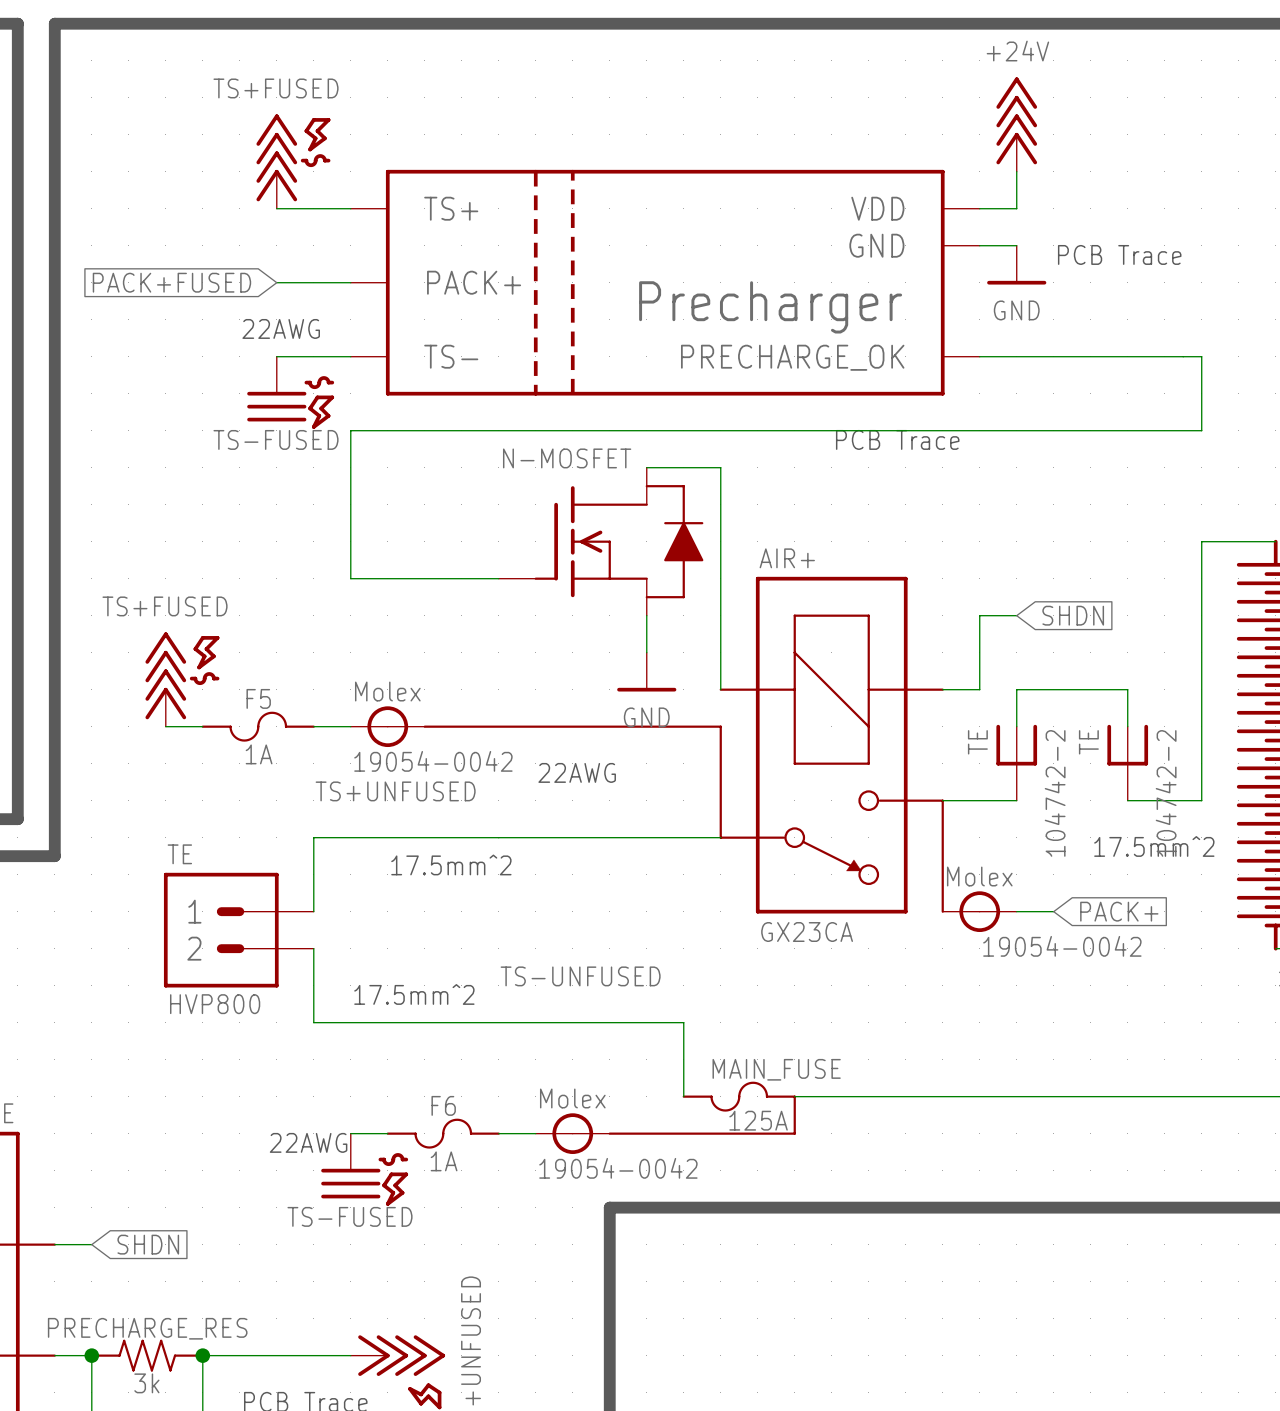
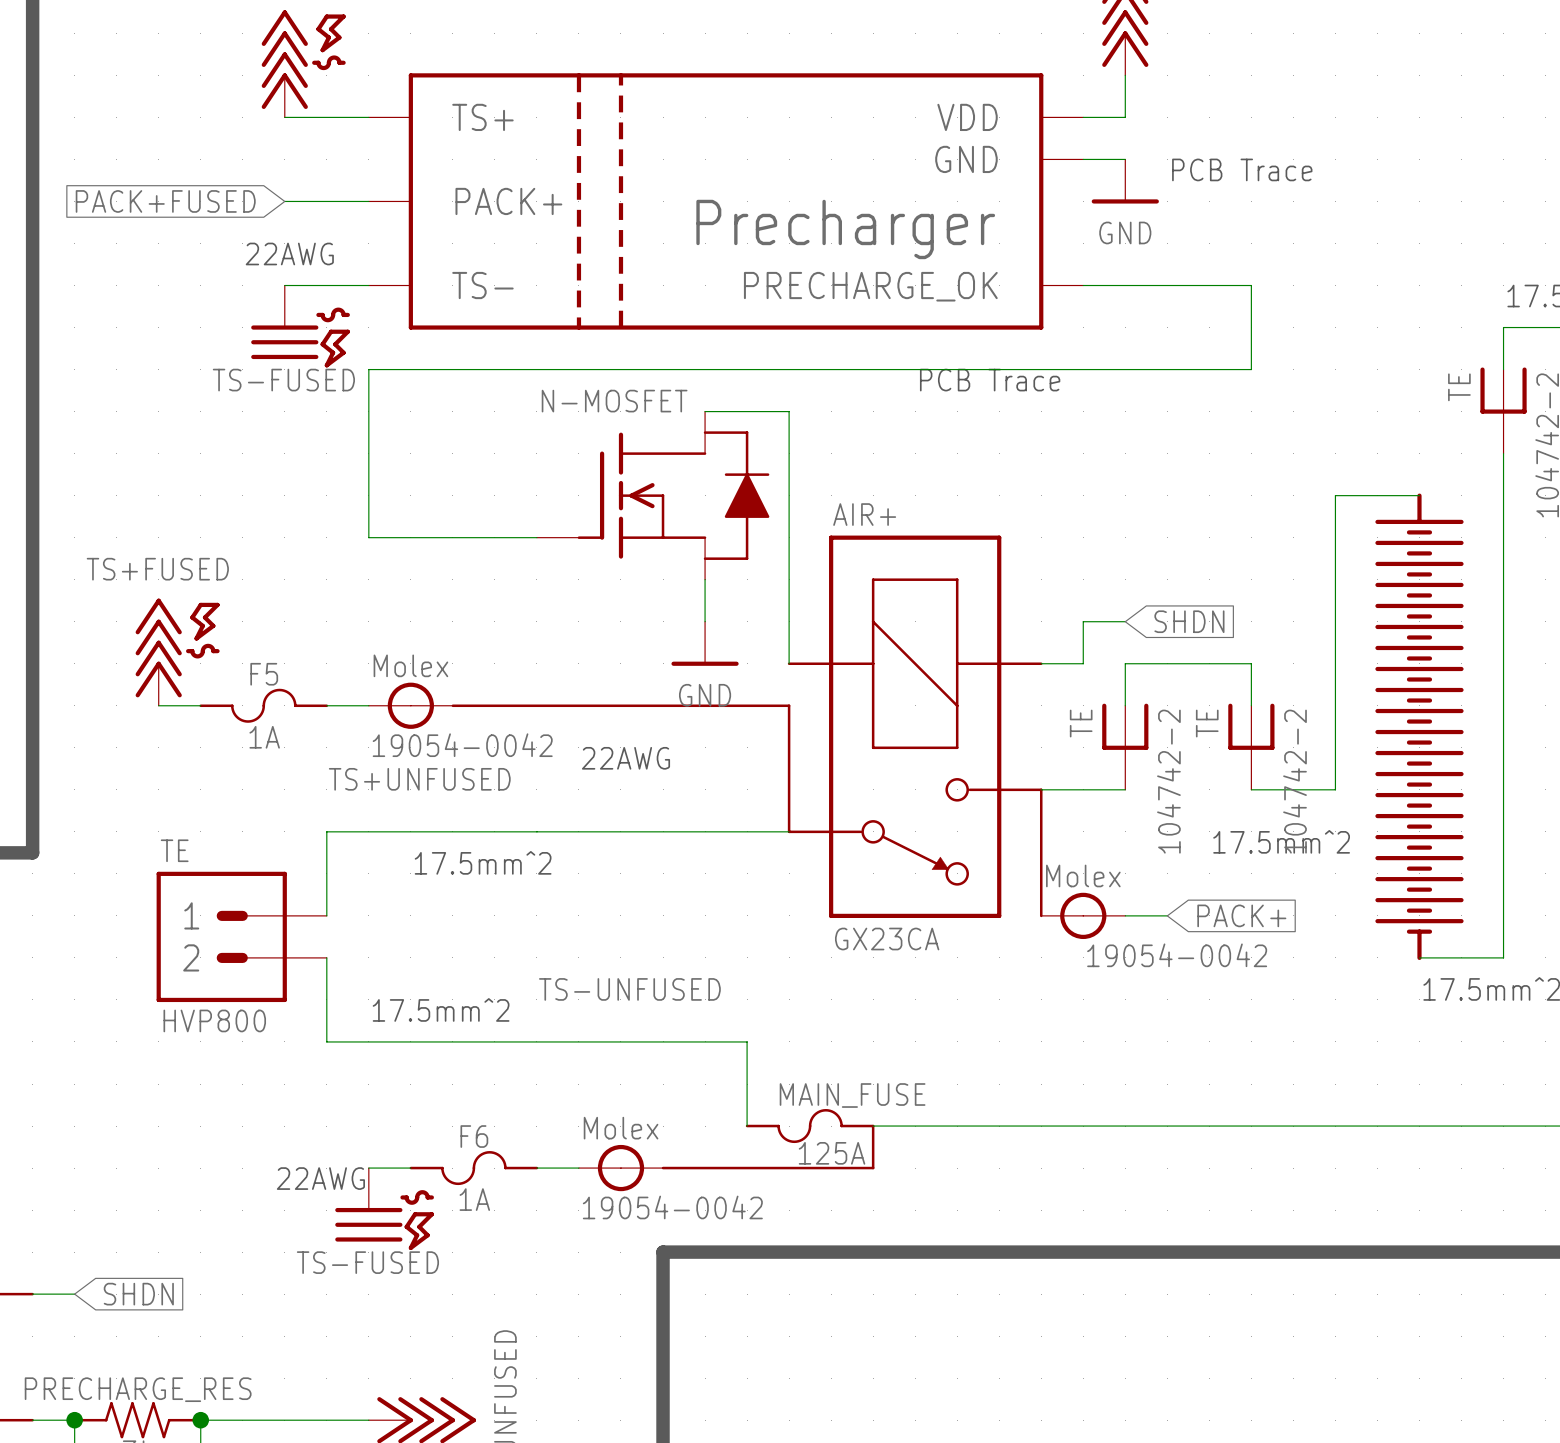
wire: (1127, 356) (1201, 356) (1201, 430) (1127, 430) -> (1251, 285) (1251, 369)
wire: (1016, 615) (979, 615) (979, 652) -> (1125, 621) (1083, 621)
global label position: SHDN (1073, 615) -> SHDN (1189, 621)

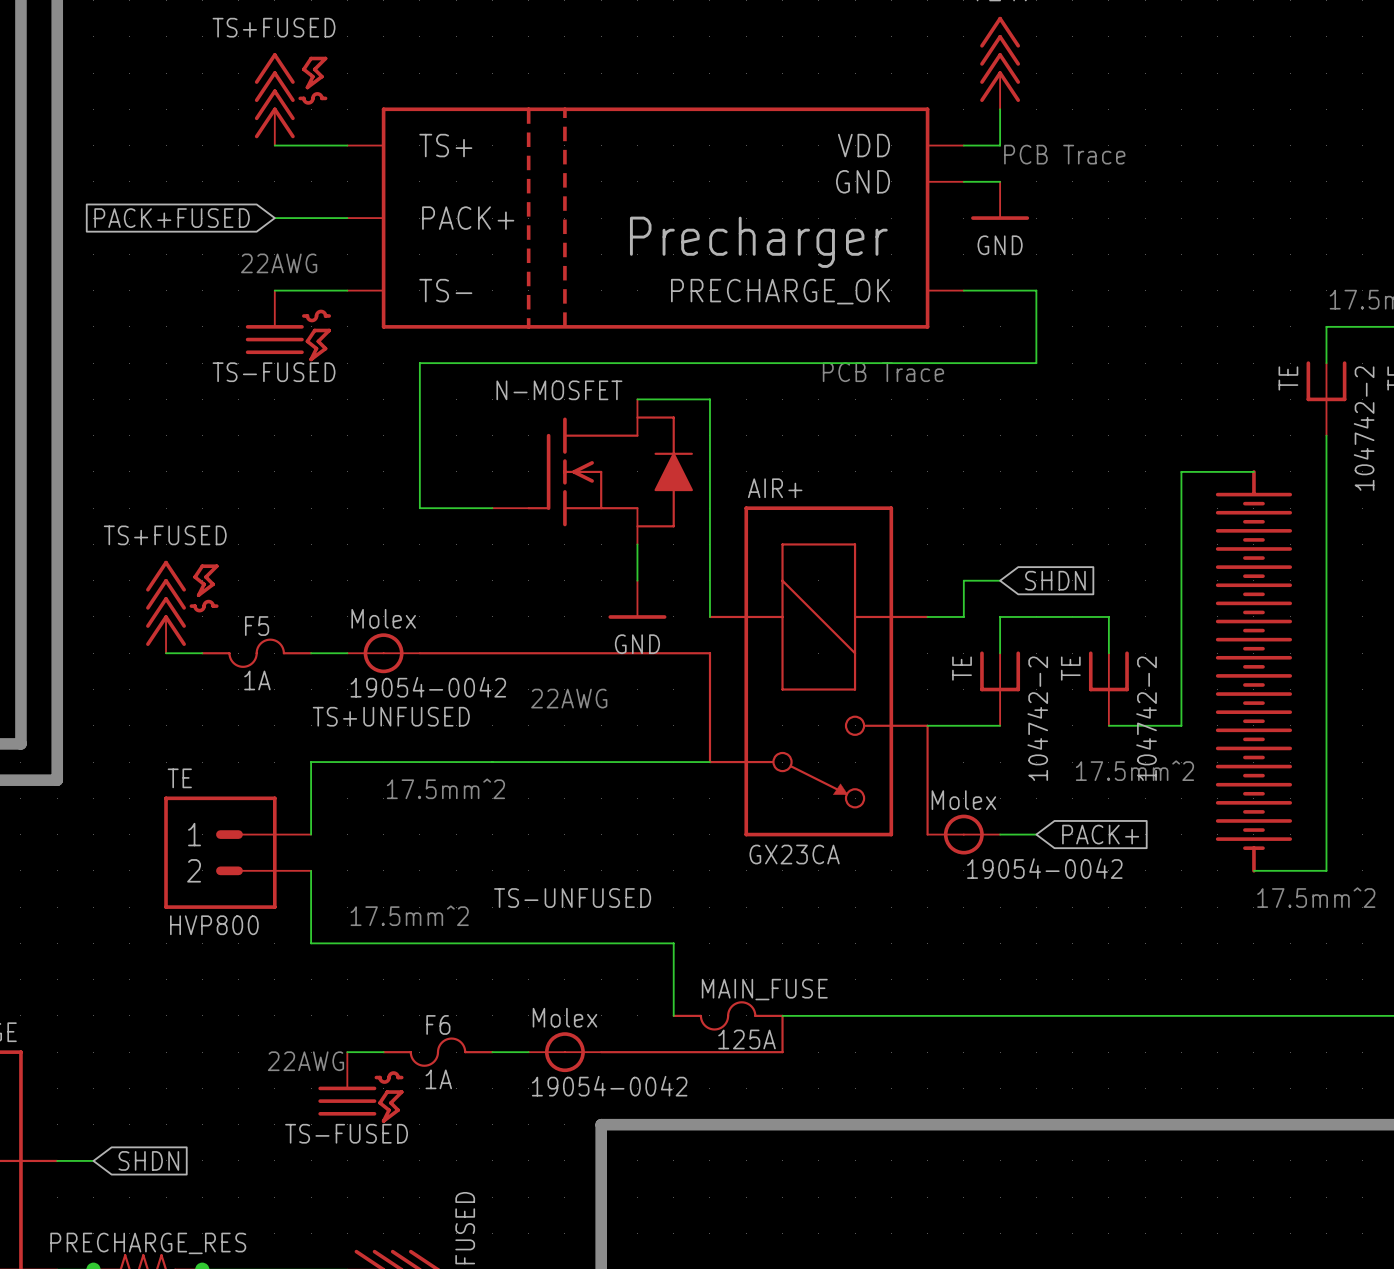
text position: PCB Trace (1242, 169) -> PCB Trace (1064, 154)
wire: (1167, 285) (1251, 285) (1251, 369) (1167, 369) -> (1036, 290) (1036, 363)
wire: (452, 369) (368, 369) (368, 537) (452, 537) -> (419, 363) (419, 508)

